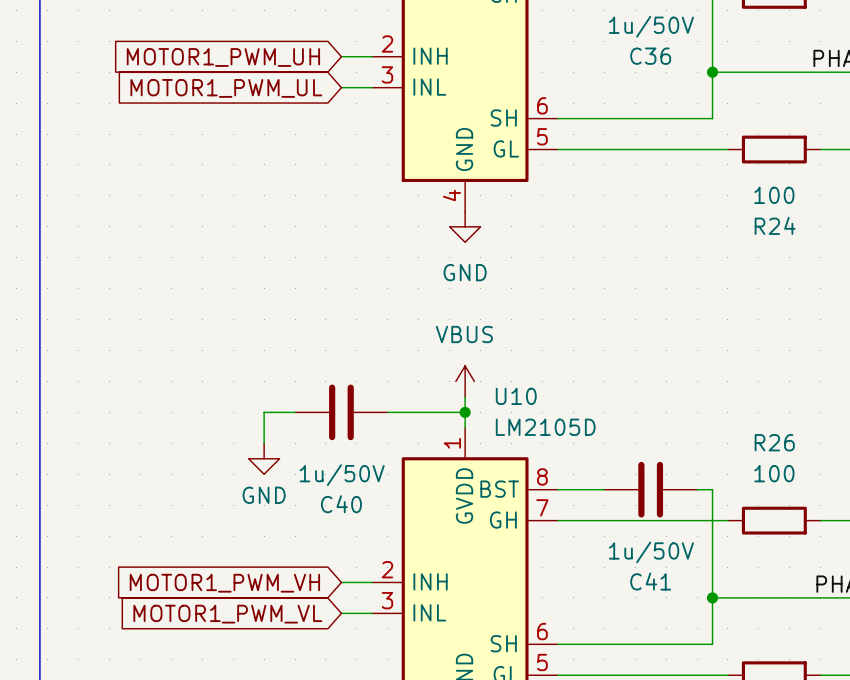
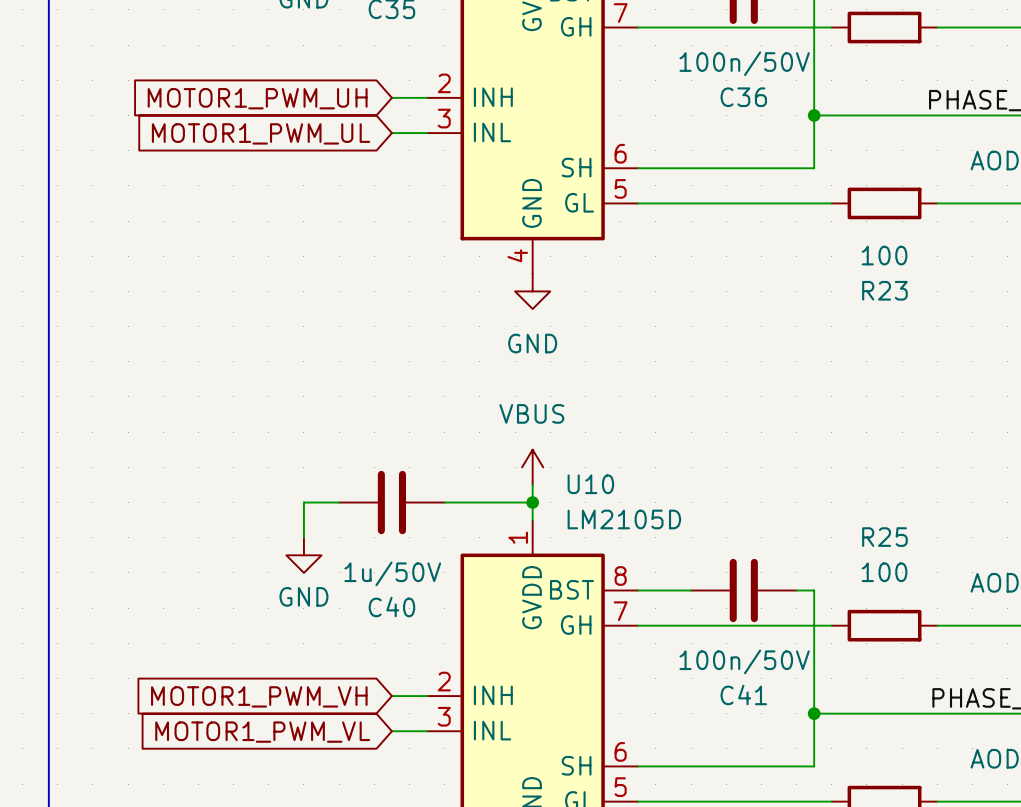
C36 value: 1u/50V (651, 26) -> 100n/50V (744, 63)
R24 name: R24 (775, 225) -> R23 (884, 290)
R26 name: R26 (774, 442) -> R25 (884, 537)
C41 value: 1u/50V (651, 552) -> 100n/50V (744, 661)

